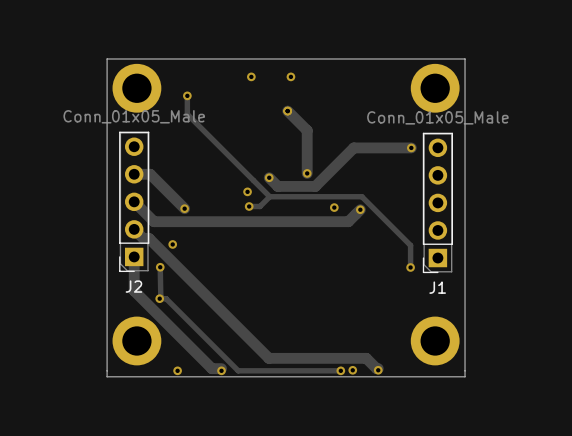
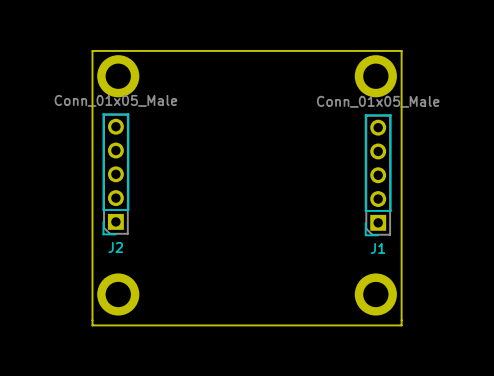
via: (251, 76) -> none
via: (290, 76) -> none
track: (187, 95) (187, 114) (248, 175) -> none
via: (187, 95) -> none
track: (287, 111) (307, 130) (307, 173) -> none
via: (287, 111) -> none
track: (411, 147) (353, 147) (315, 186) (277, 186) (269, 177) -> none
via: (411, 147) -> none
via: (307, 173) -> none
track: (134, 174) (150, 174) (184, 208) -> none
track: (249, 176) (269, 196) -> none
via: (269, 177) -> none
via: (247, 191) -> none
track: (269, 196) (361, 196) (410, 245) (410, 267) -> none
track: (269, 196) (260, 206) (249, 206) -> none
track: (134, 201) (154, 221) (348, 221) (360, 209) -> none
via: (249, 206) -> none
via: (334, 207) -> none
via: (184, 208) -> none
via: (360, 209) -> none
track: (134, 229) (143, 238) (149, 238) (268, 358) (366, 358) (378, 368) -> none
via: (172, 244) -> none
track: (134, 256) (134, 290) (211, 368) (221, 368) -> none
track: (160, 266) (159, 298) (166, 298) (238, 370) (340, 370) -> none
via: (160, 267) -> none
via: (410, 267) -> none
via: (159, 298) -> none
via: (177, 370) -> none
via: (221, 370) -> none
via: (340, 370) -> none
via: (352, 370) -> none
via: (378, 370) -> none

